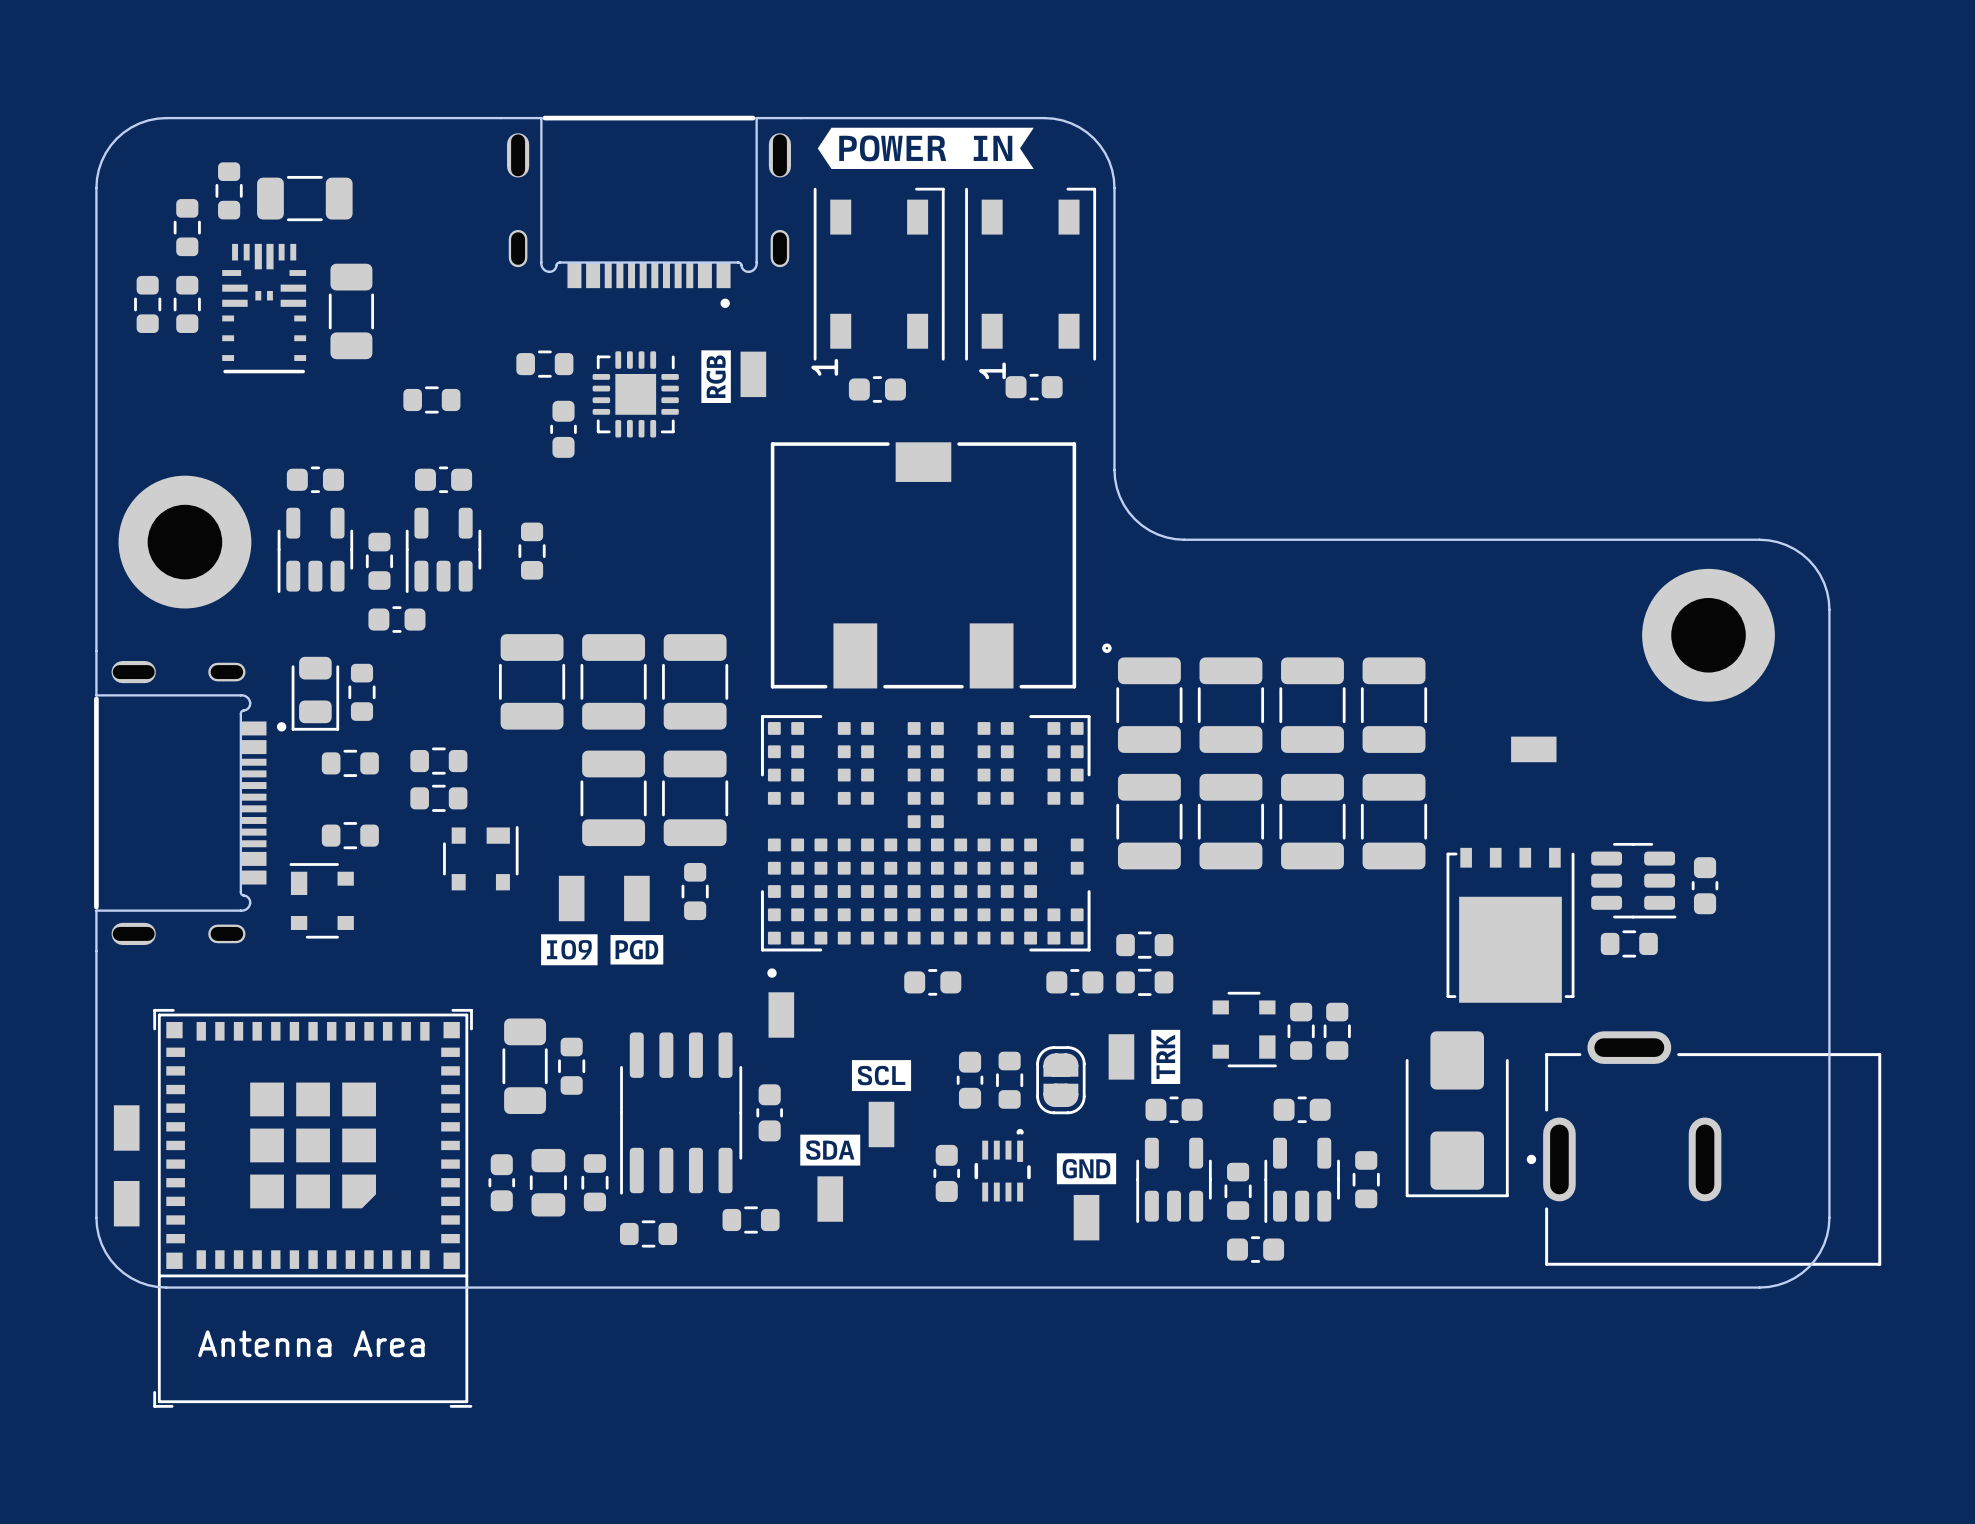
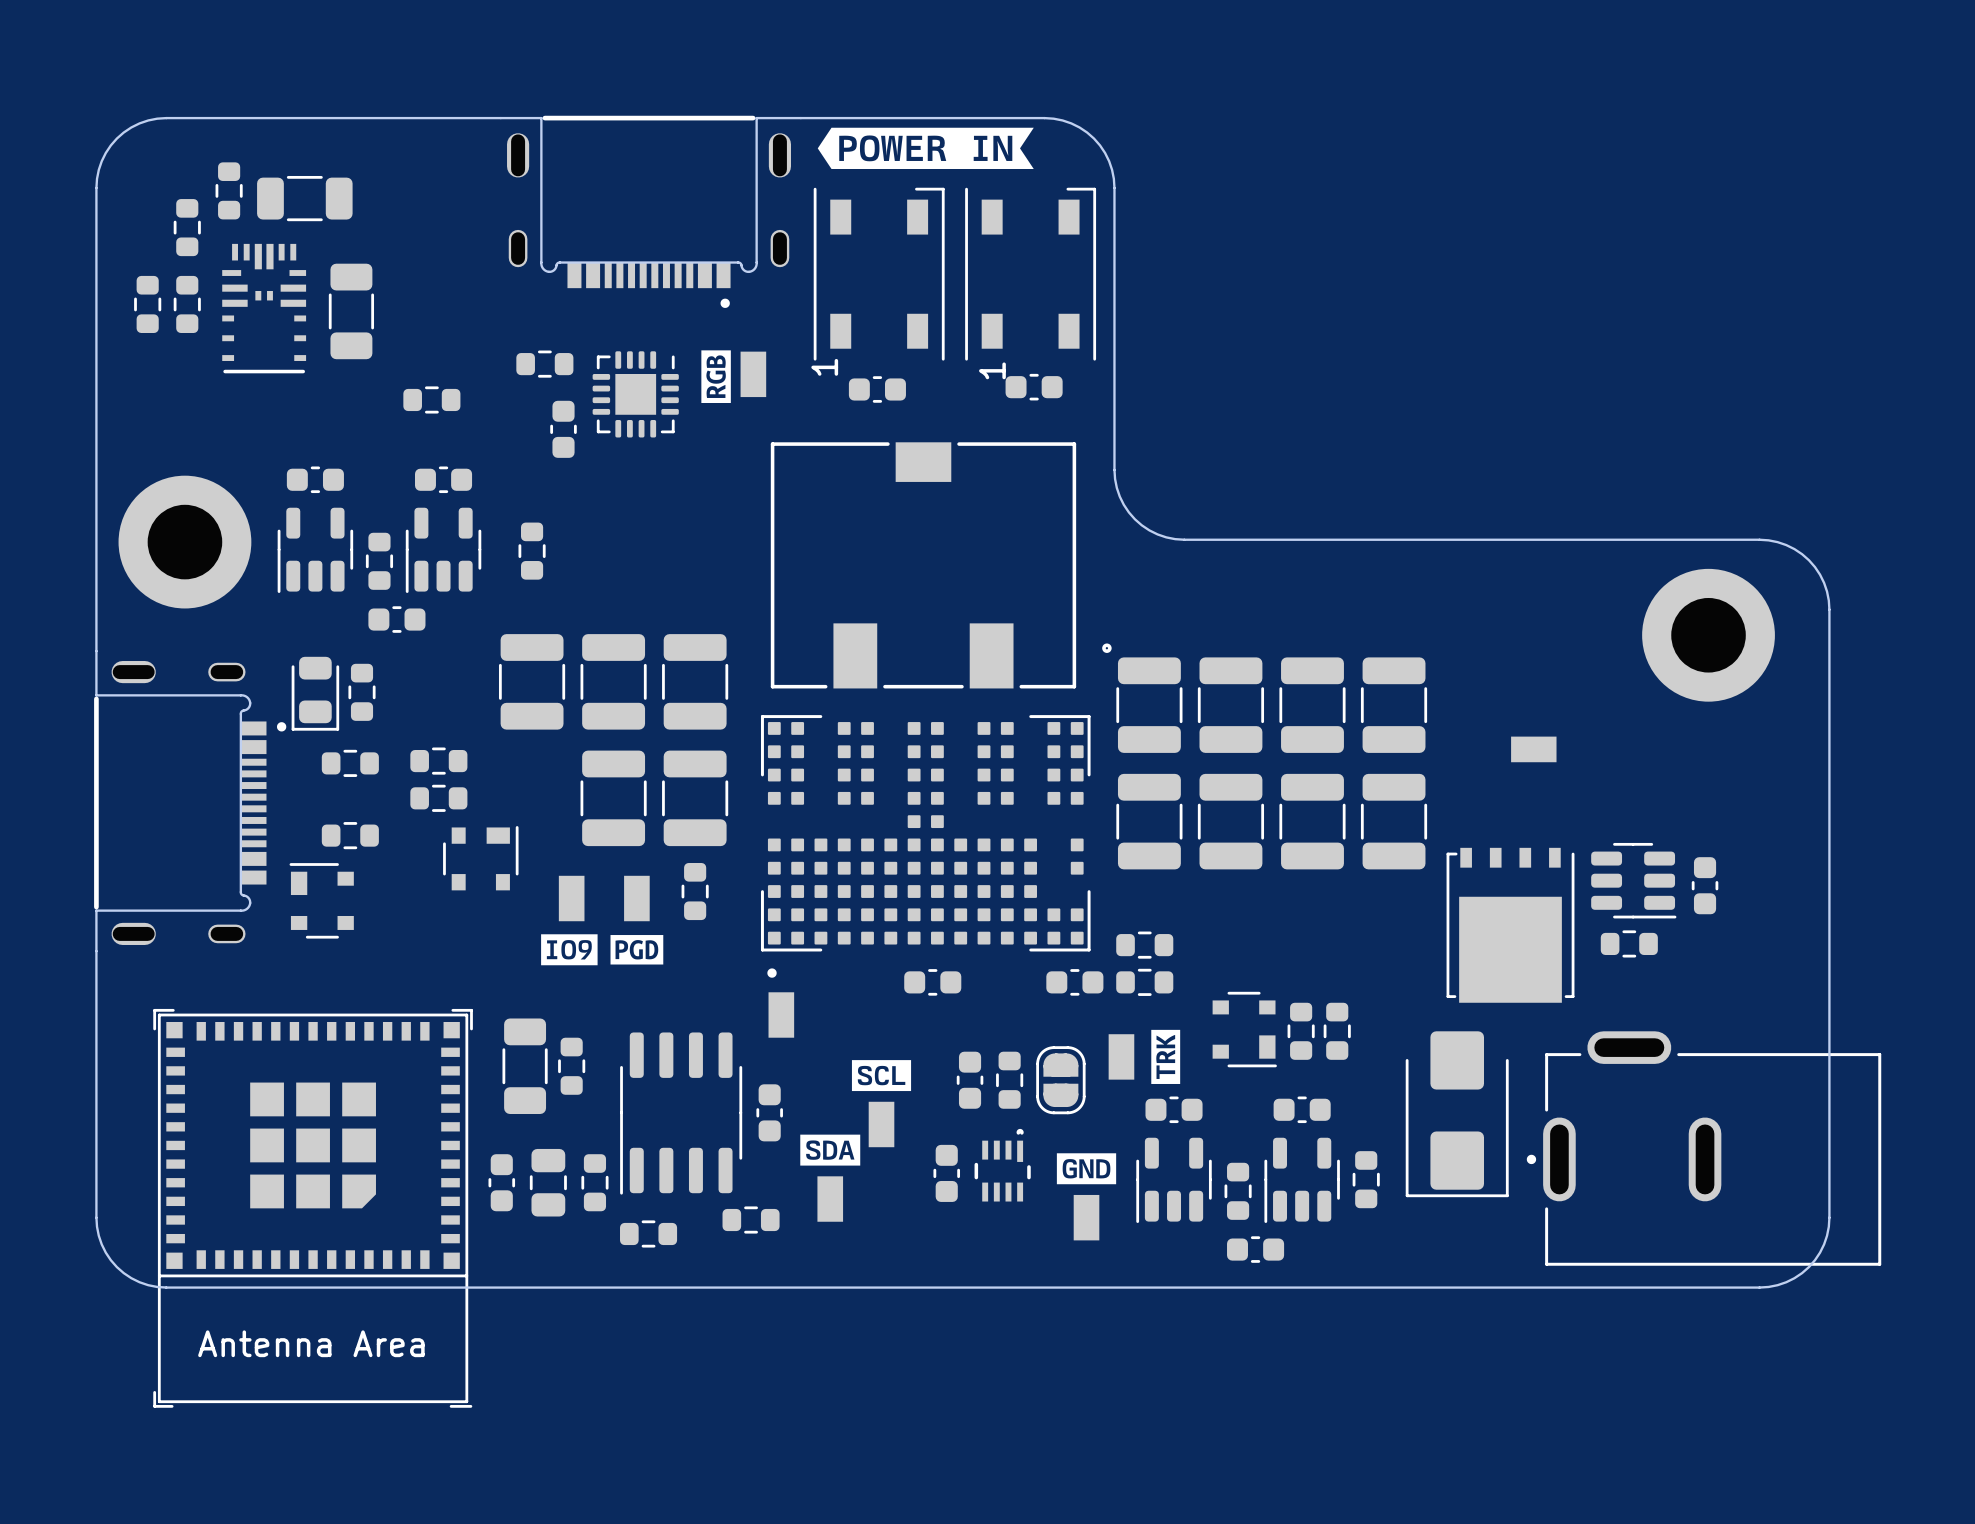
part: (126, 1127) -> none
part: (126, 1203) -> none

